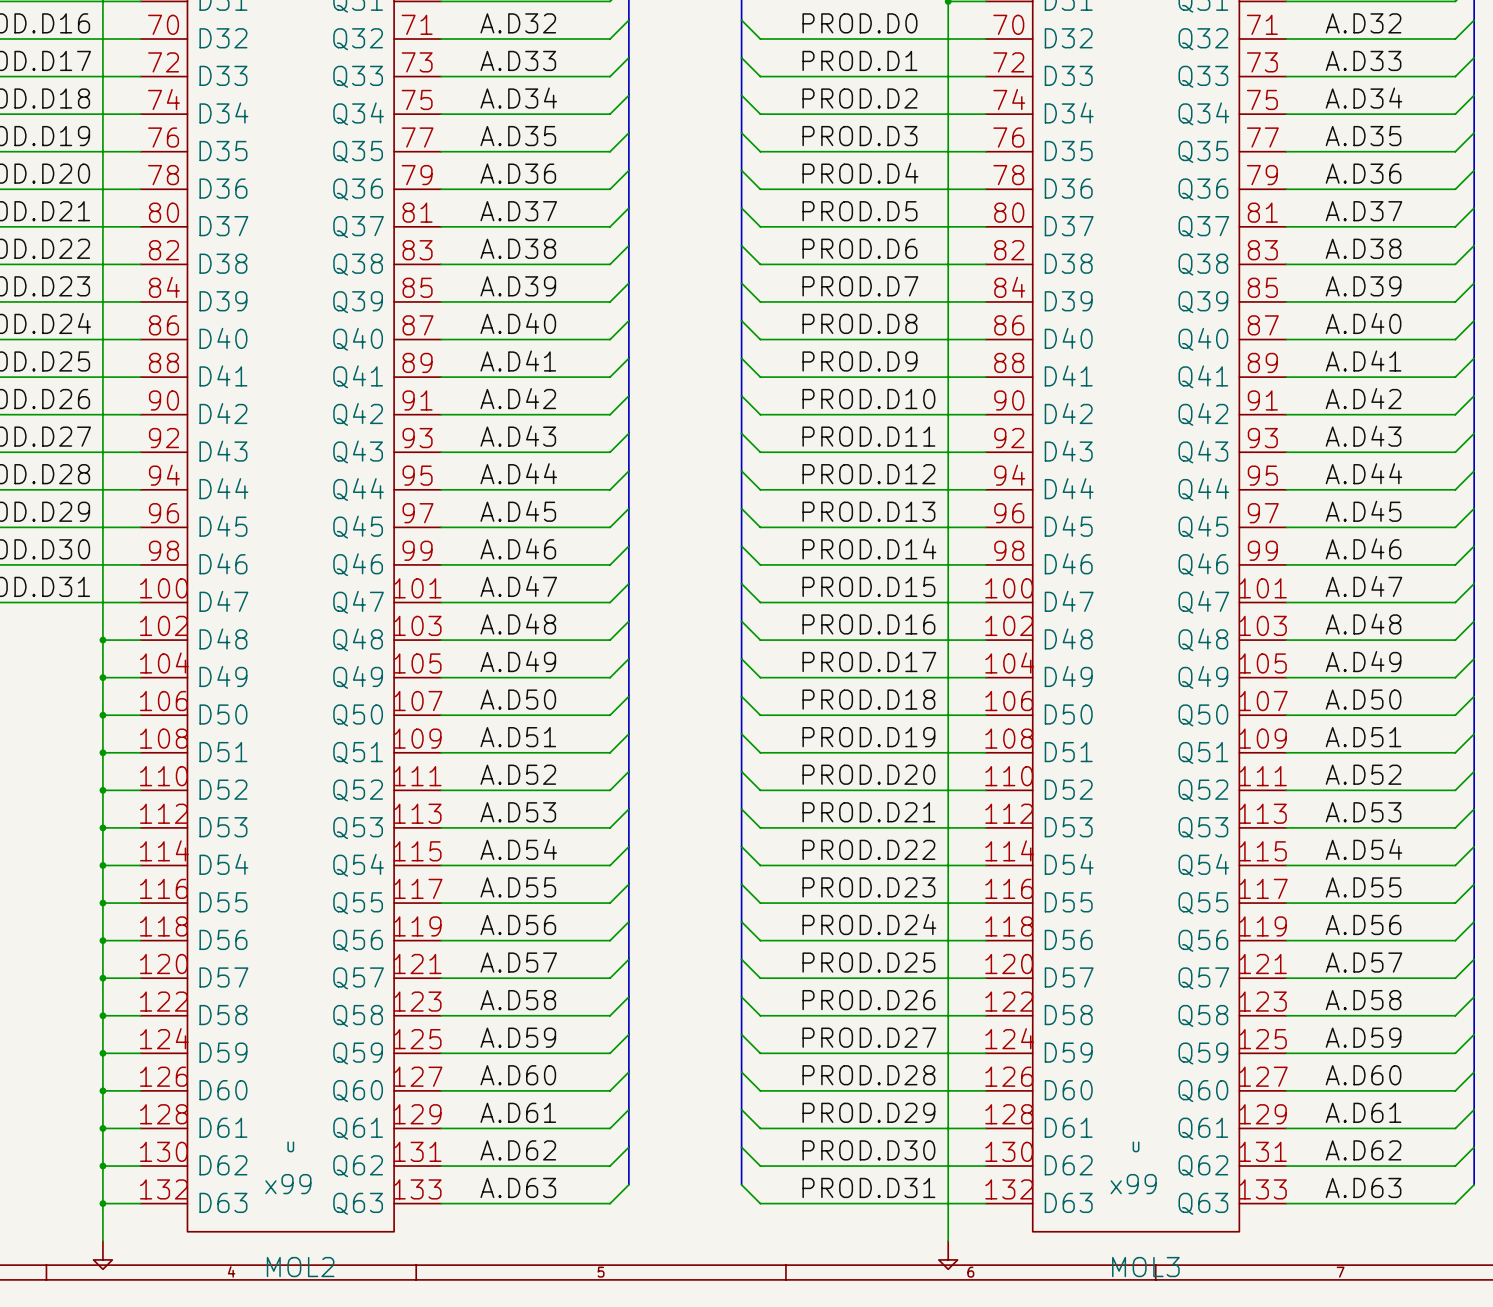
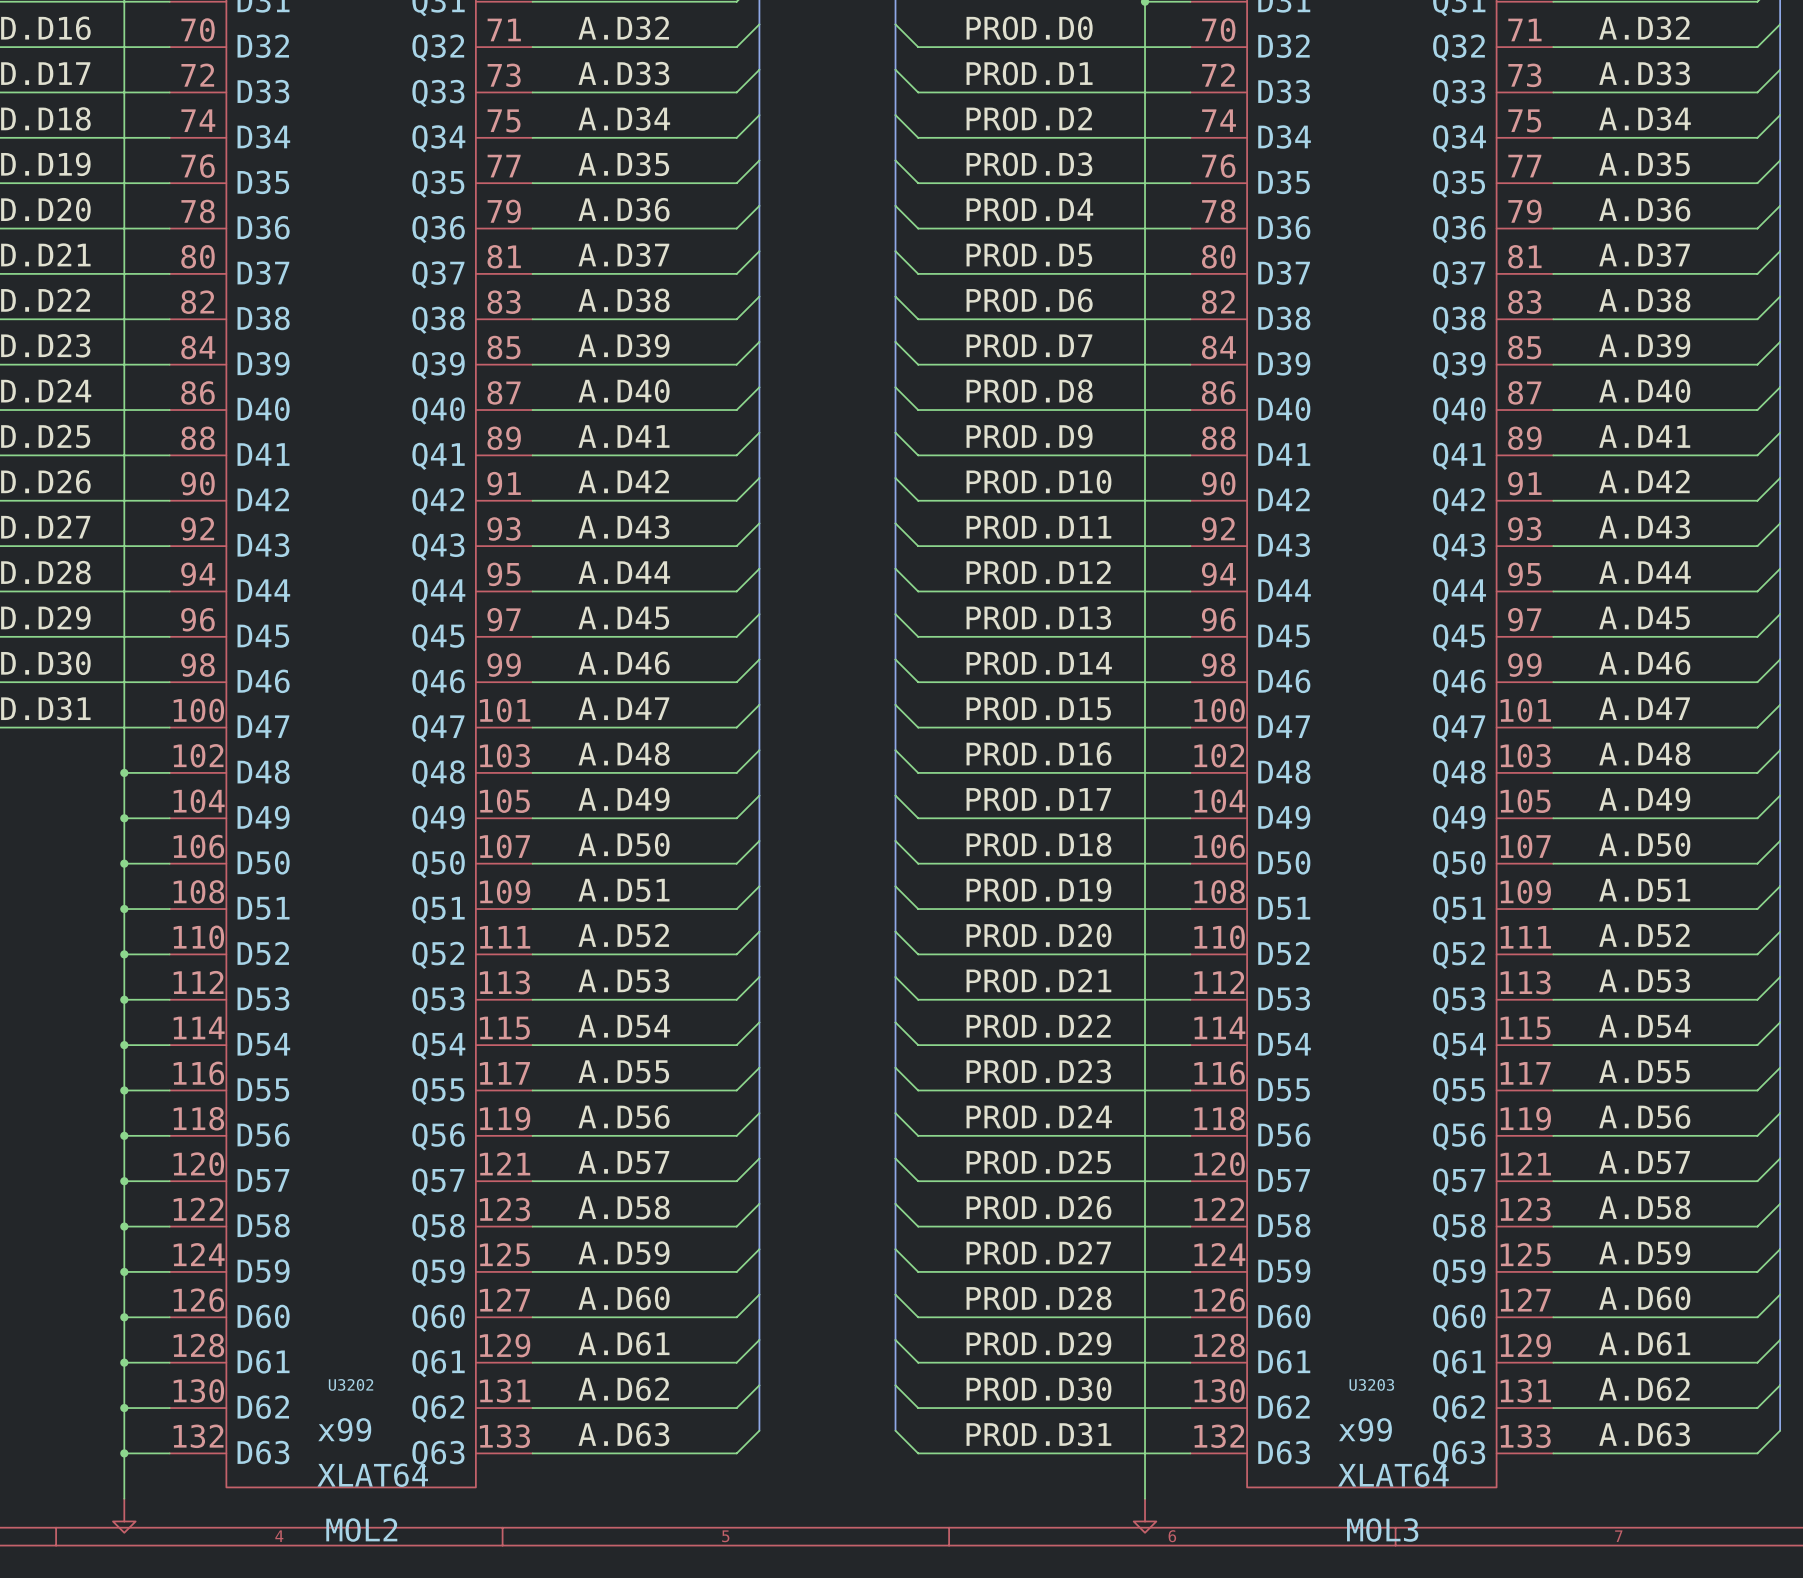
U name: U (290, 1146) -> U3202 (351, 1384)
U name: U (1136, 1146) -> U3203 (1371, 1384)
U value: none -> XLAT64 (372, 1475)
U value: none -> XLAT64 (1393, 1475)

